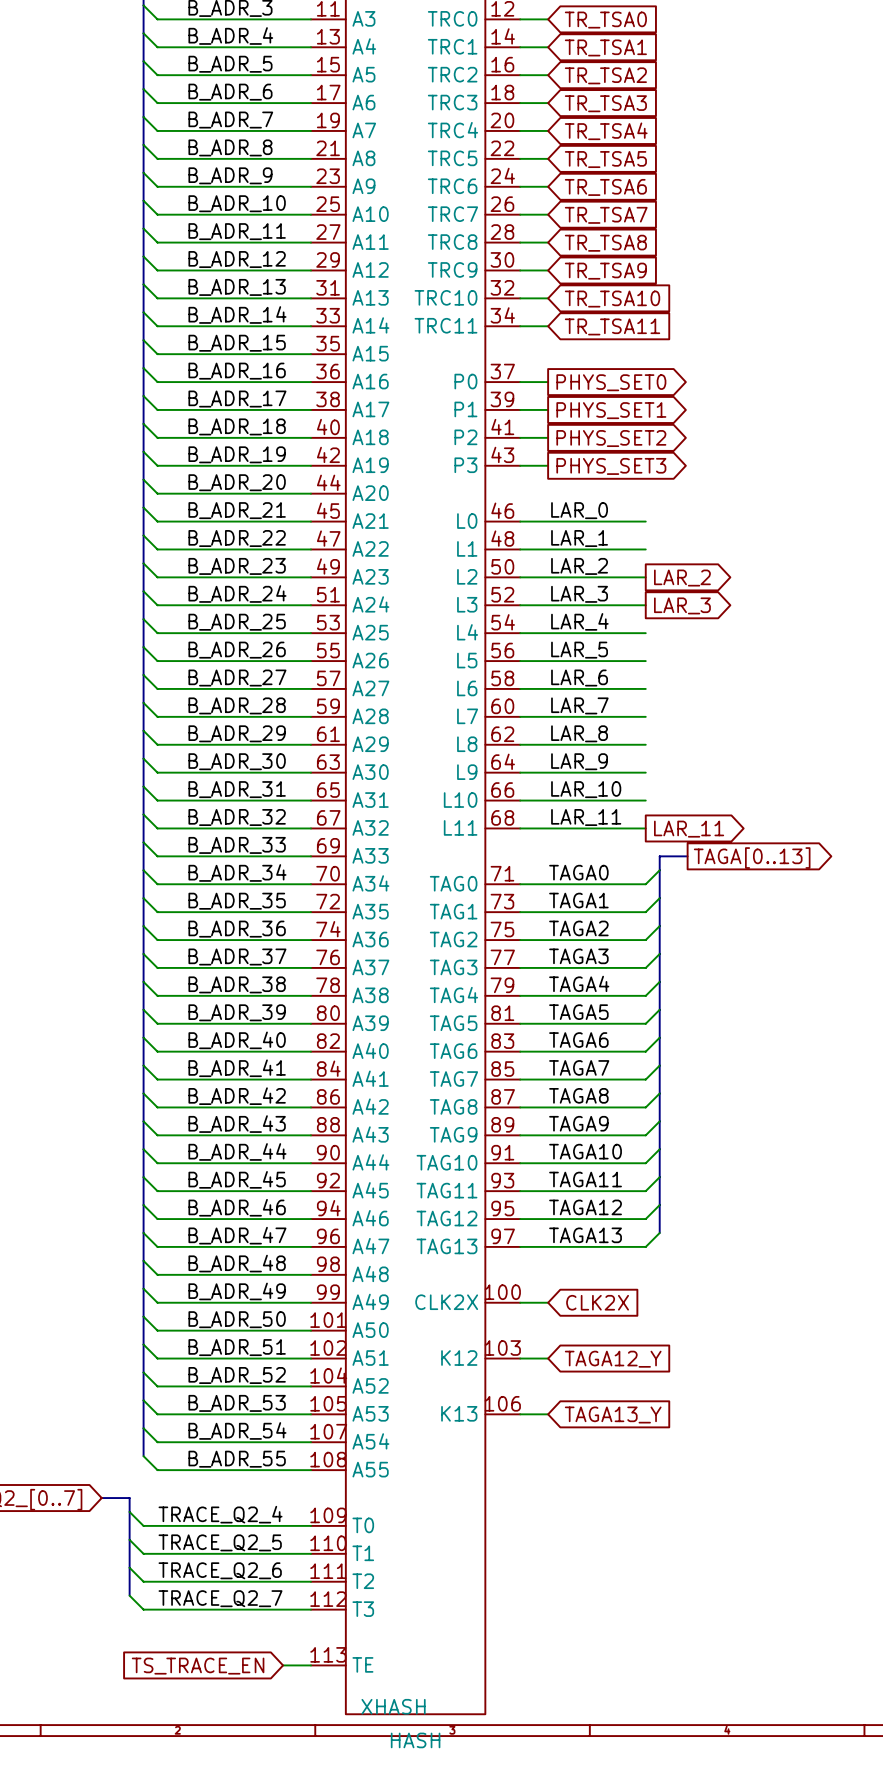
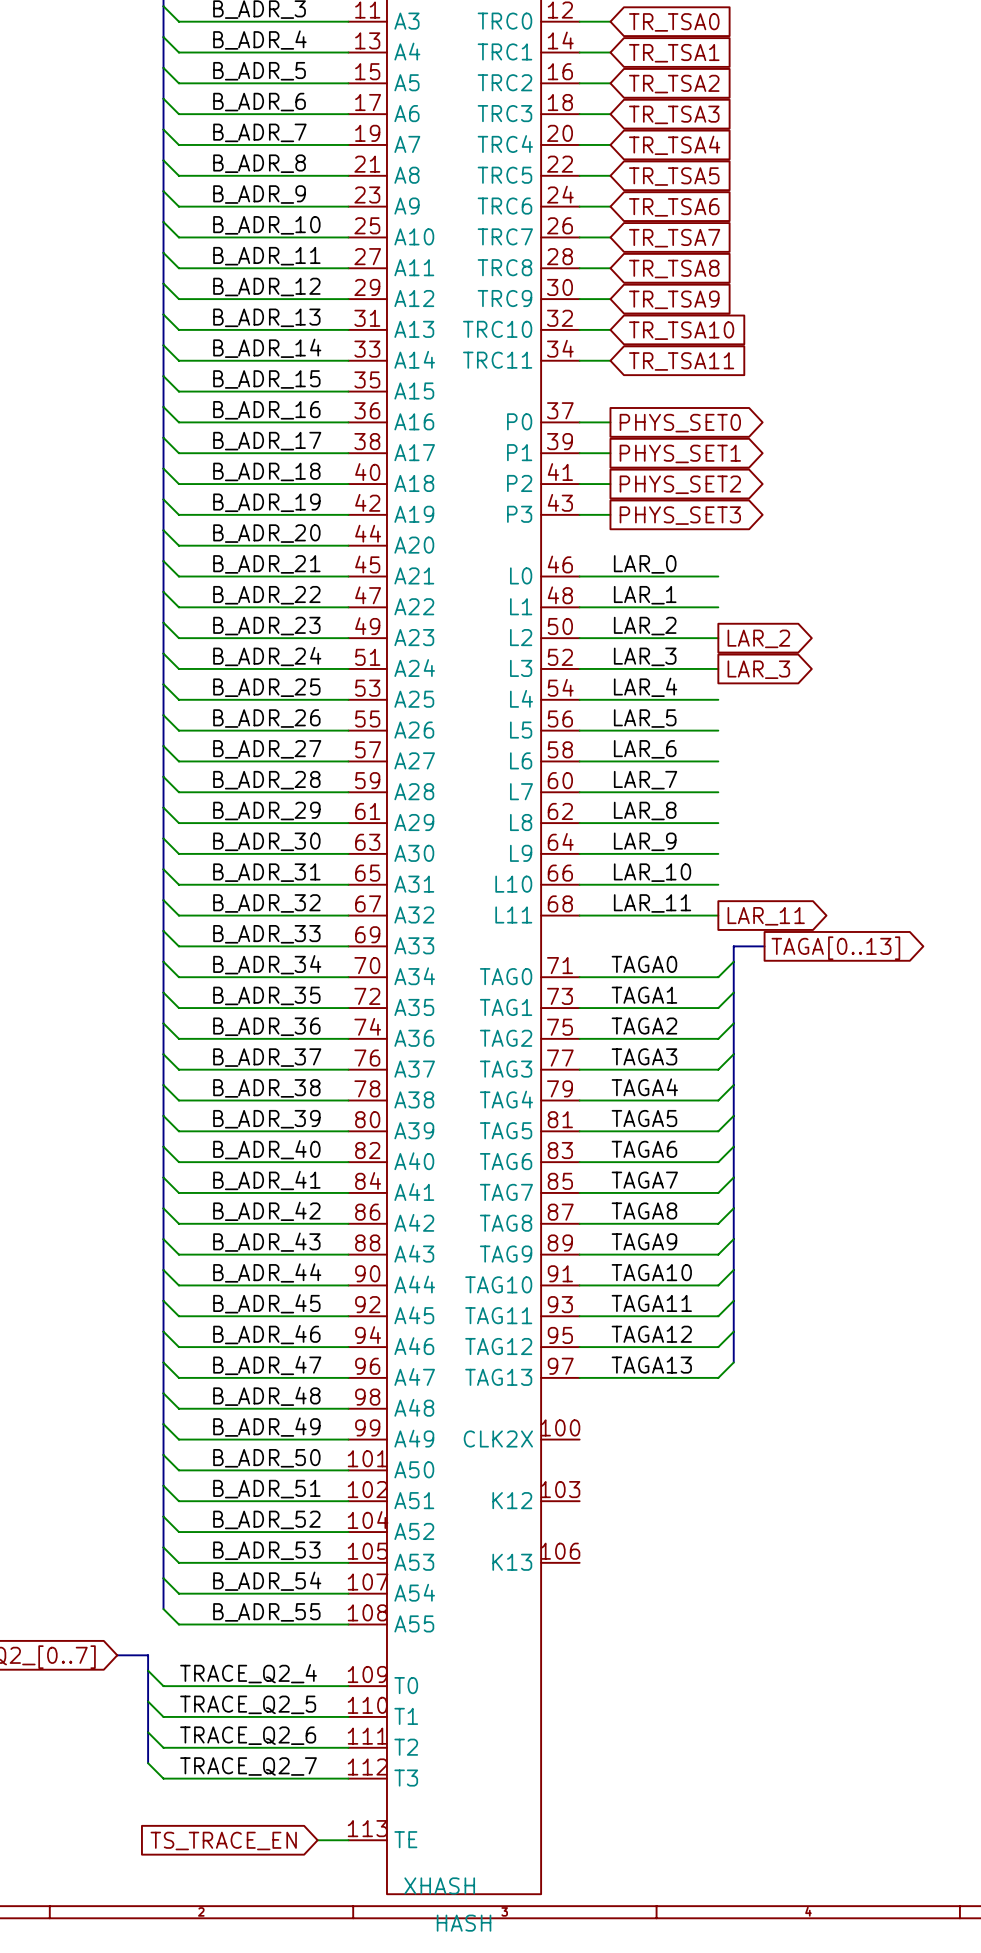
wire: (520, 1302) (548, 1302) -> none
global label: CLK2X (597, 1302) -> none
wire: (520, 1358) (548, 1358) -> none
global label: TAGA12_Y (613, 1359) -> none
wire: (520, 1414) (548, 1414) -> none
global label: TAGA13_Y (613, 1415) -> none

